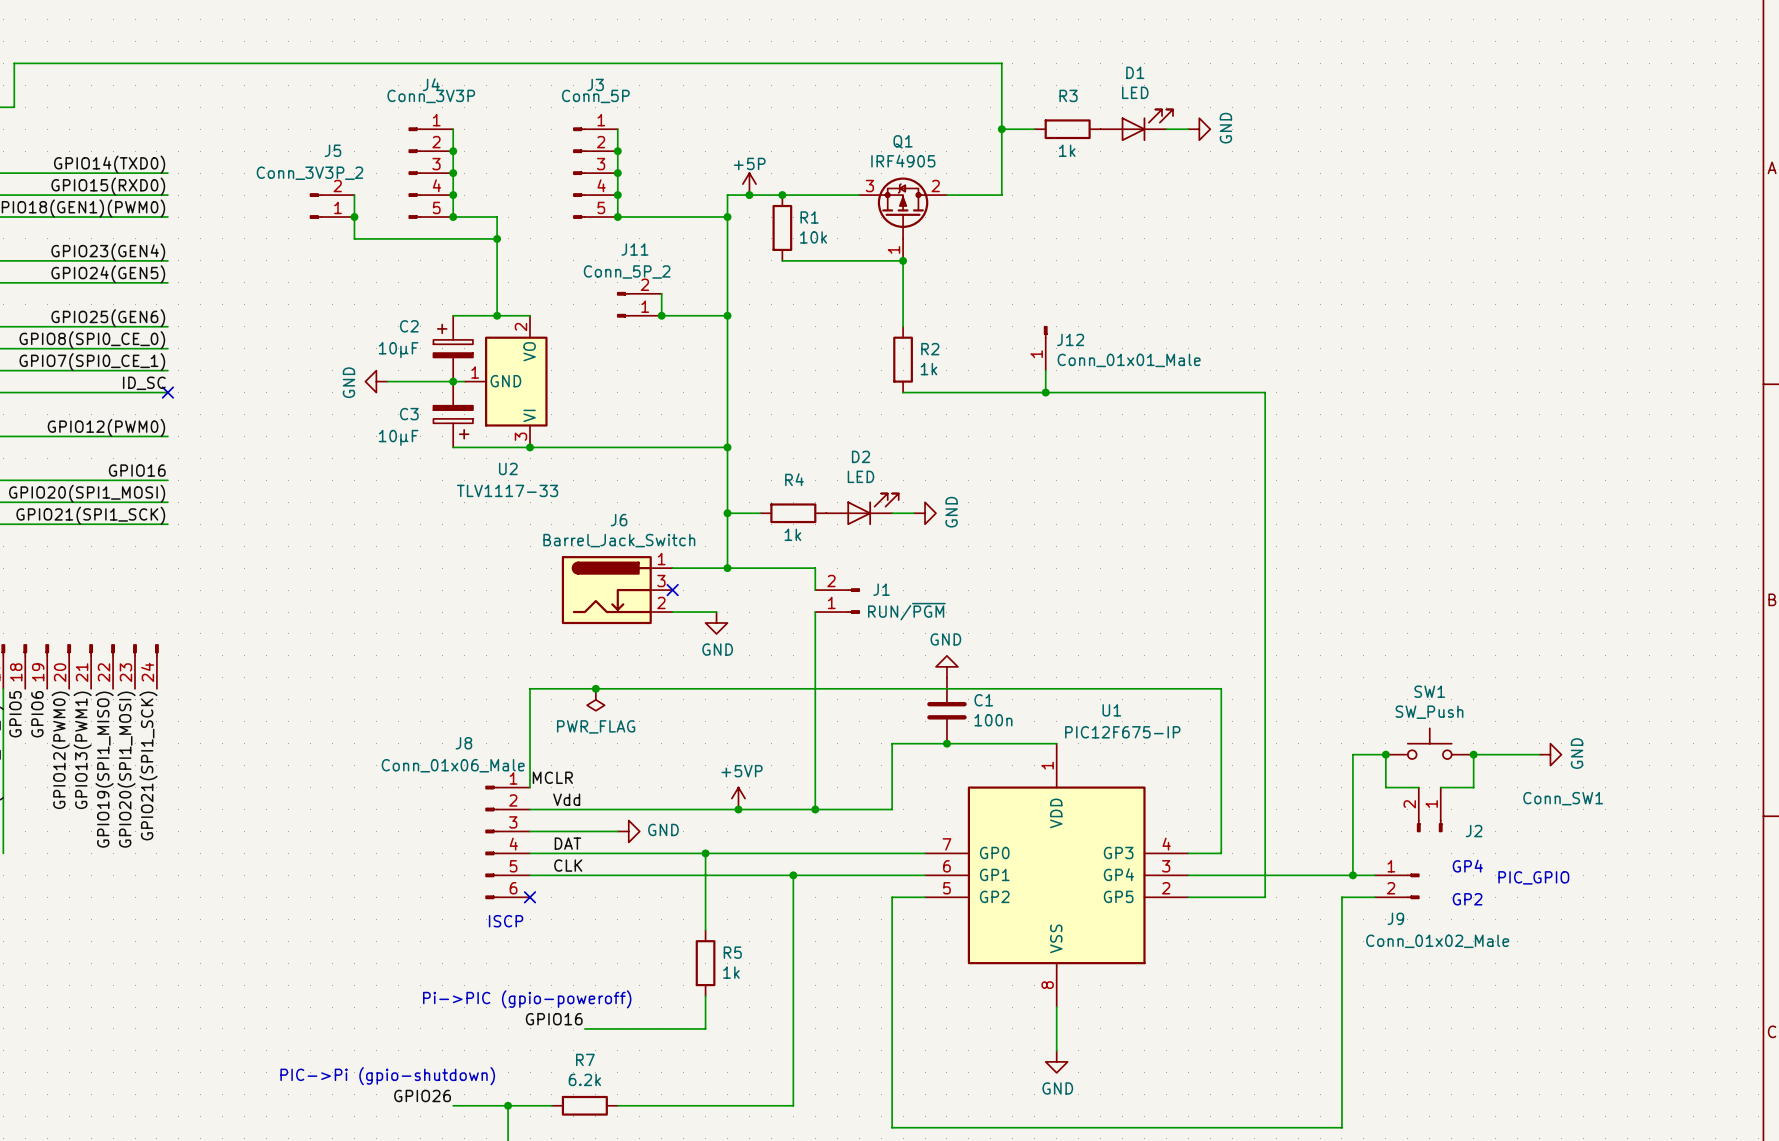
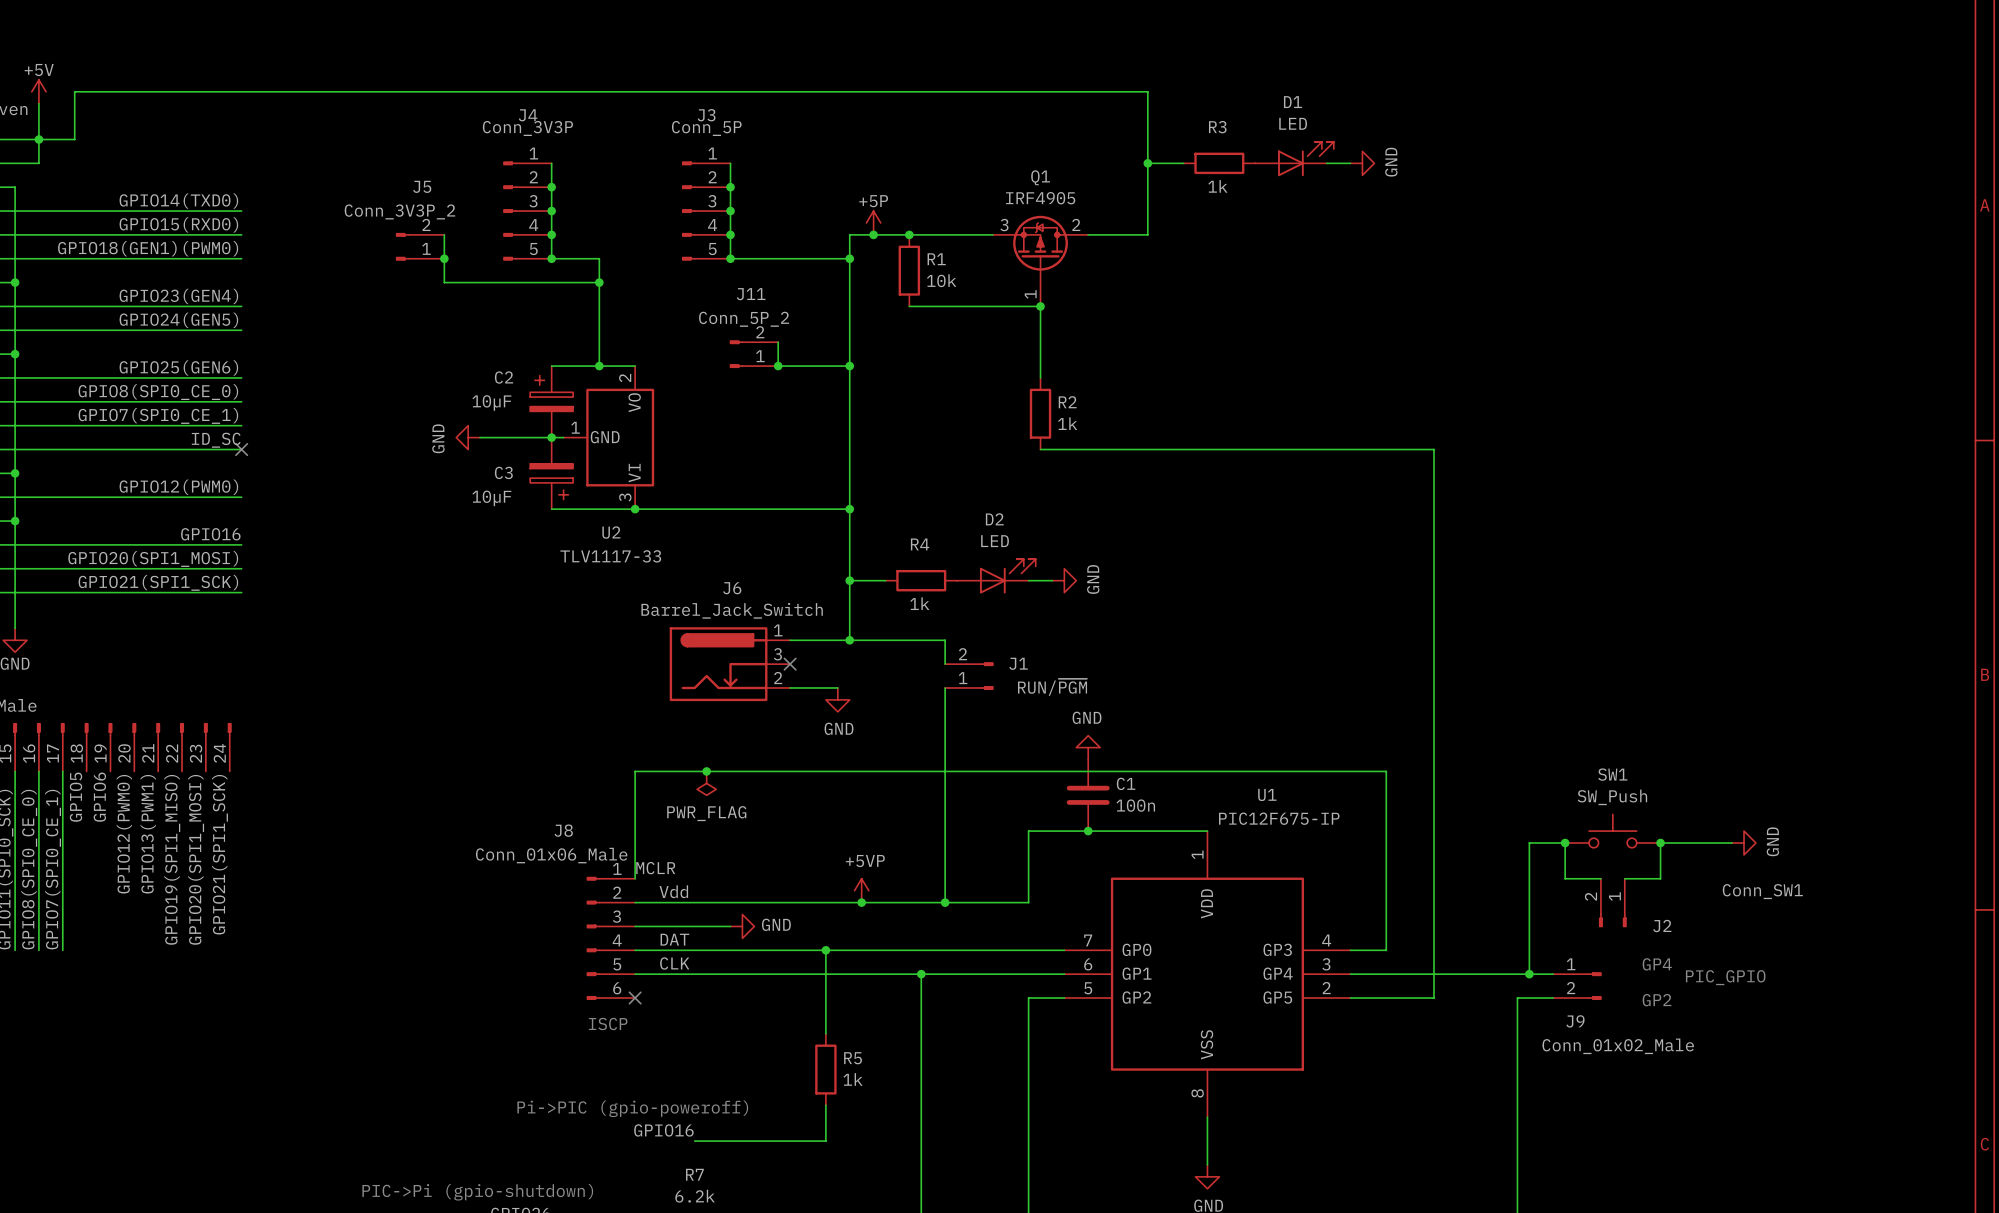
J12: Conn_01x01_Male (1045, 348) -> none
wire: (1045, 370) (1045, 392) -> none
junction: (1045, 392) -> none

